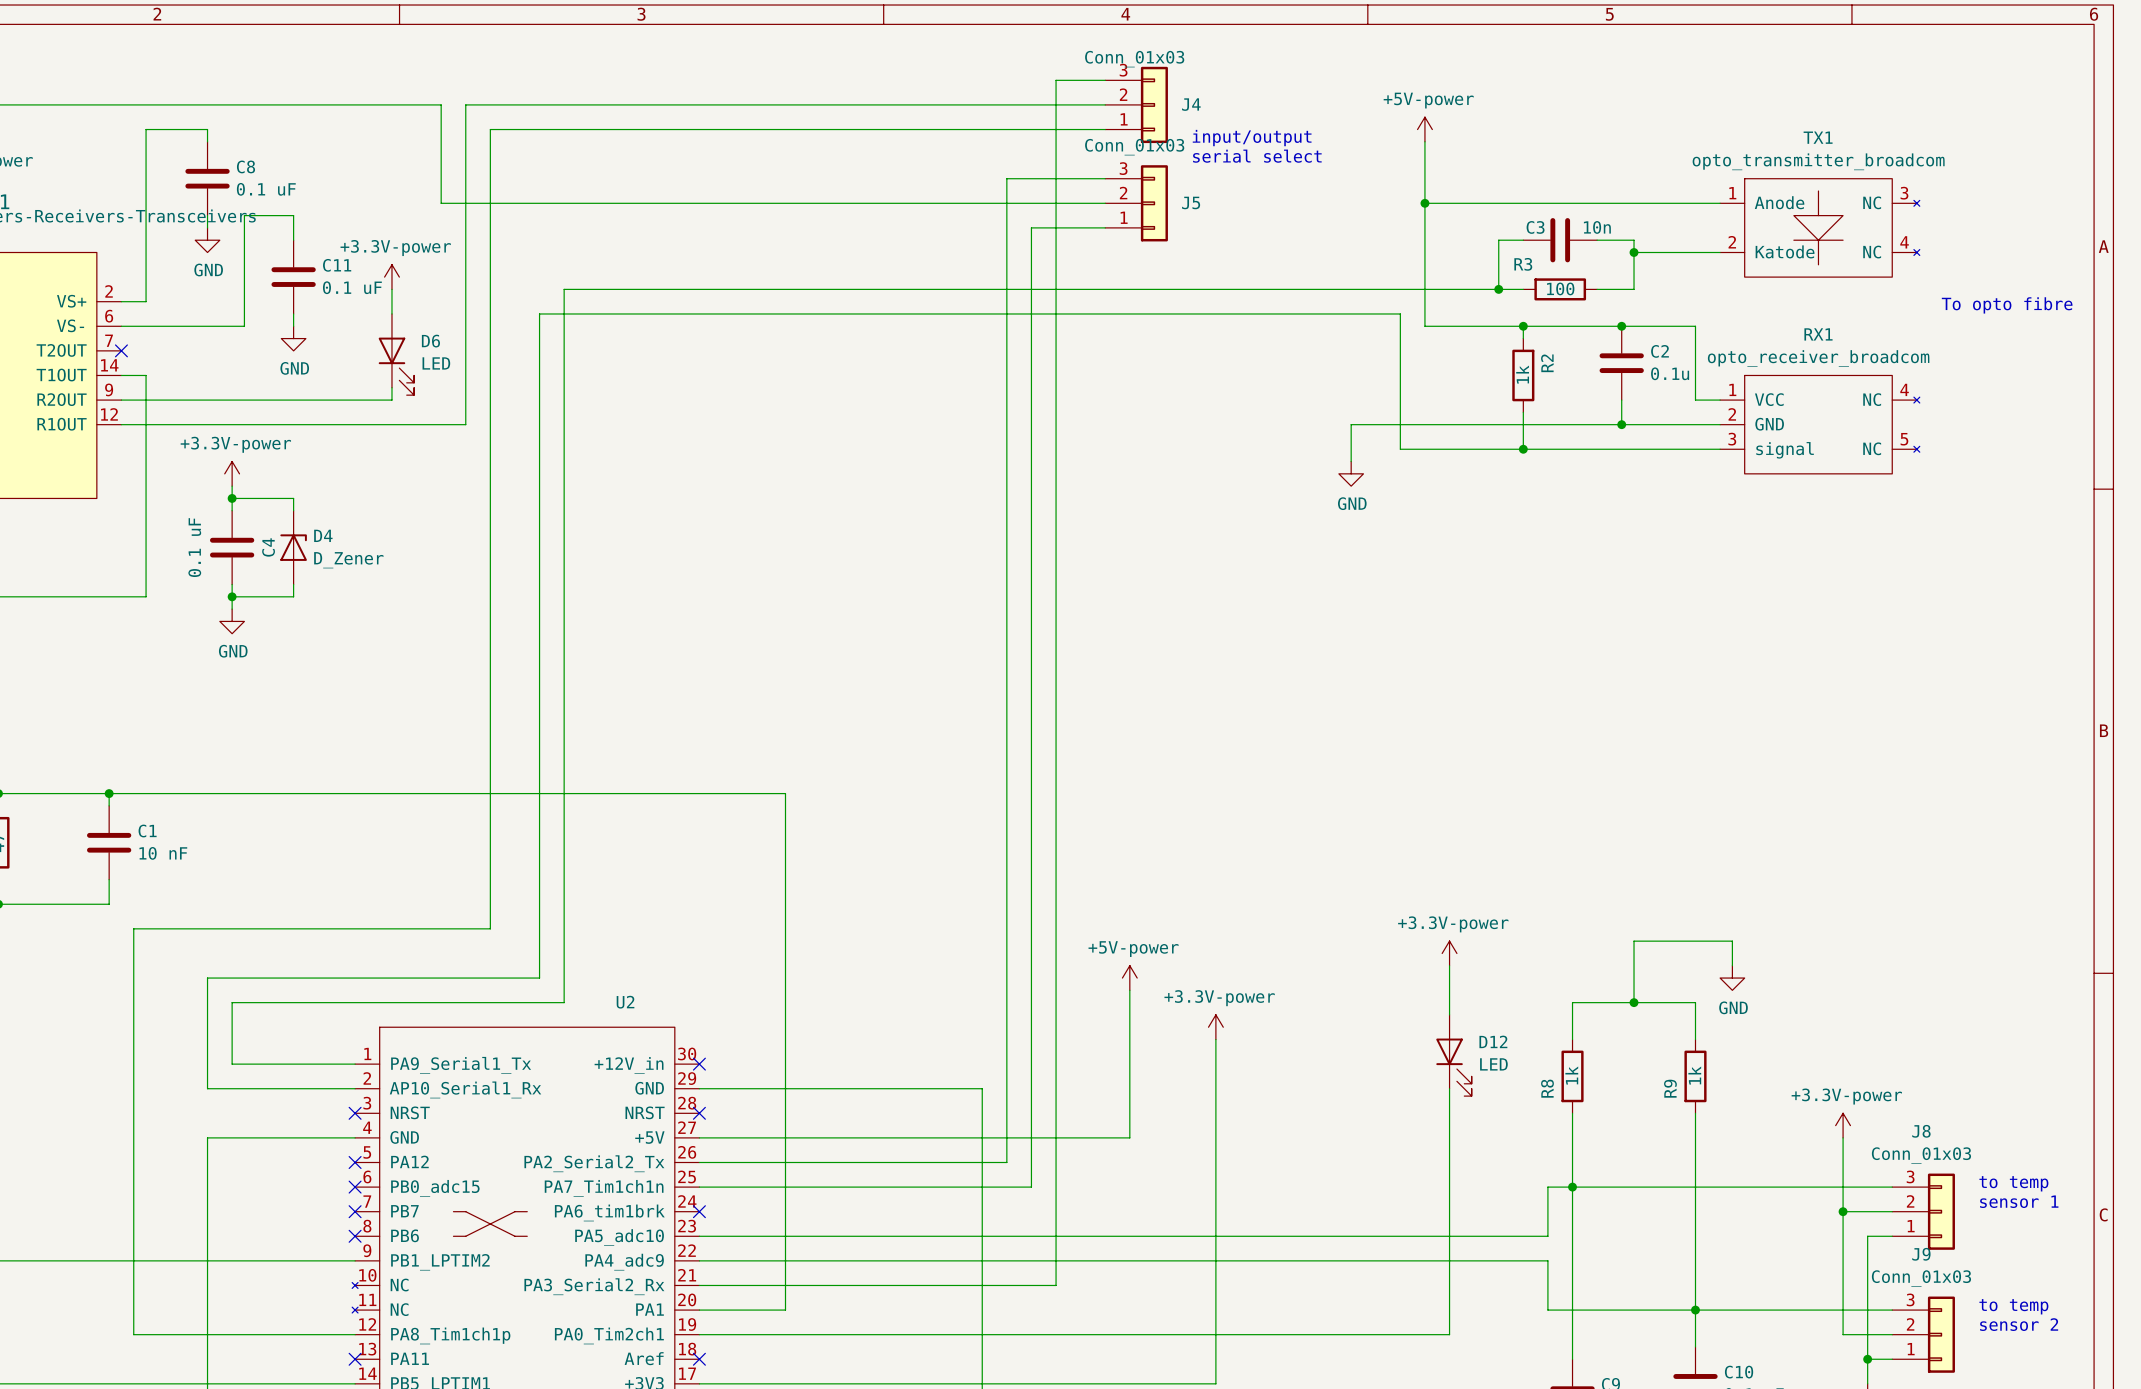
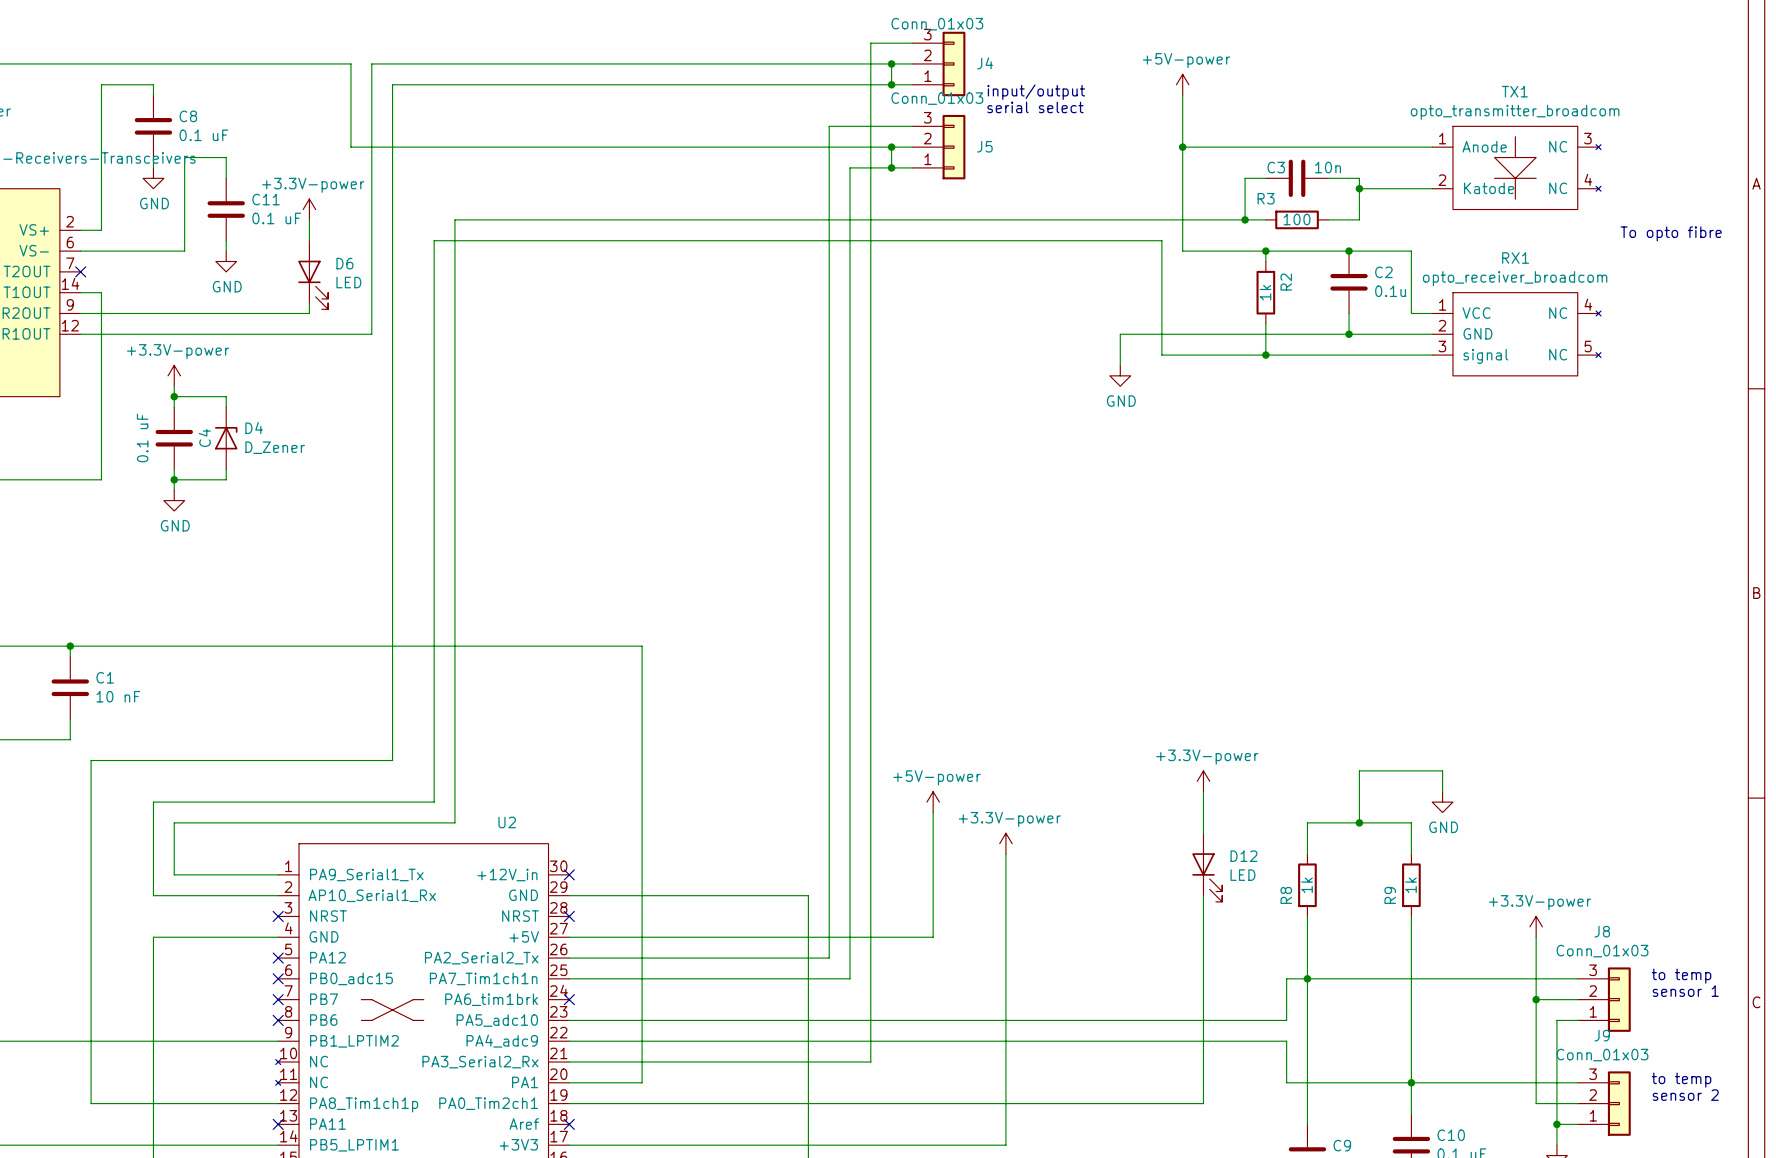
wire: none -> (891, 63) (891, 84)
junction: none -> (891, 63)
junction: none -> (891, 84)
wire: none -> (891, 147) (891, 167)
junction: none -> (891, 147)
junction: none -> (891, 167)

